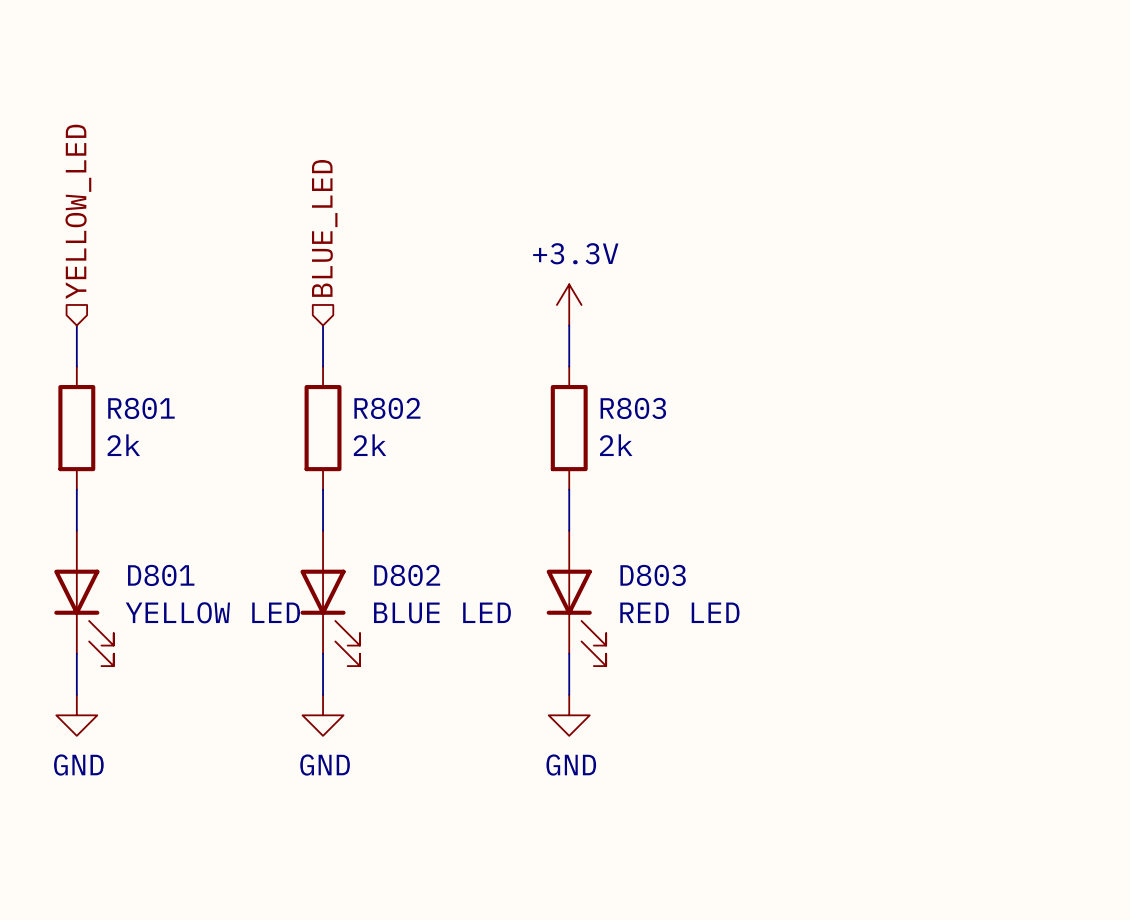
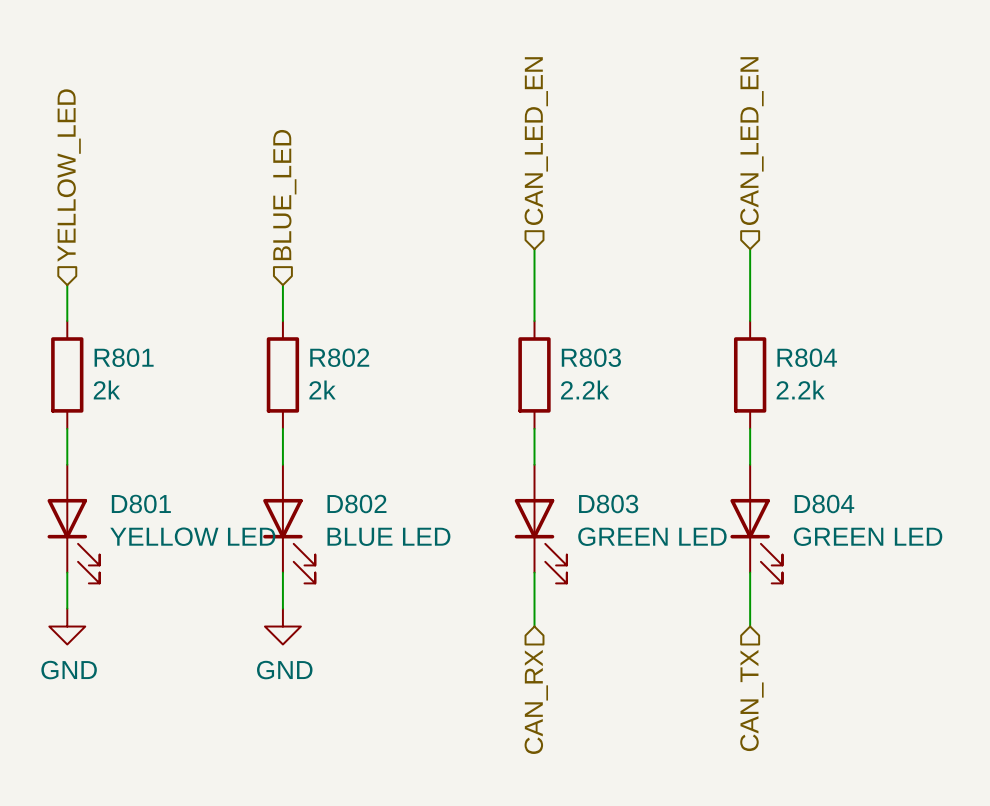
hierarchical label: none -> CAN_LED_EN (536, 141)
hierarchical label: none -> CAN_LED_EN (751, 141)
wire: none -> (534, 249) (534, 321)
wire: none -> (750, 249) (750, 321)
power symbol: +3.3V (569, 304) -> none
wire: (569, 325) (569, 366) -> (750, 428) (750, 464)
R803 position: (569, 428) -> (534, 374)
R804: none -> 2.2k (750, 374)
R803 value: 2k (616, 445) -> 2.2k (585, 389)
wire: (569, 489) (569, 530) -> (534, 428) (534, 464)
D803 position: (576, 598) -> (540, 524)
D804: none -> GREEN LED (756, 524)
D803 value: RED LED (679, 612) -> GREEN LED (652, 536)
wire: (569, 653) (569, 694) -> none
wire: none -> (534, 572) (534, 626)
wire: none -> (750, 572) (750, 626)
power symbol: GND (569, 715) -> none
hierarchical label: none -> CAN_RX (536, 701)
hierarchical label: none -> CAN_TX (751, 700)

